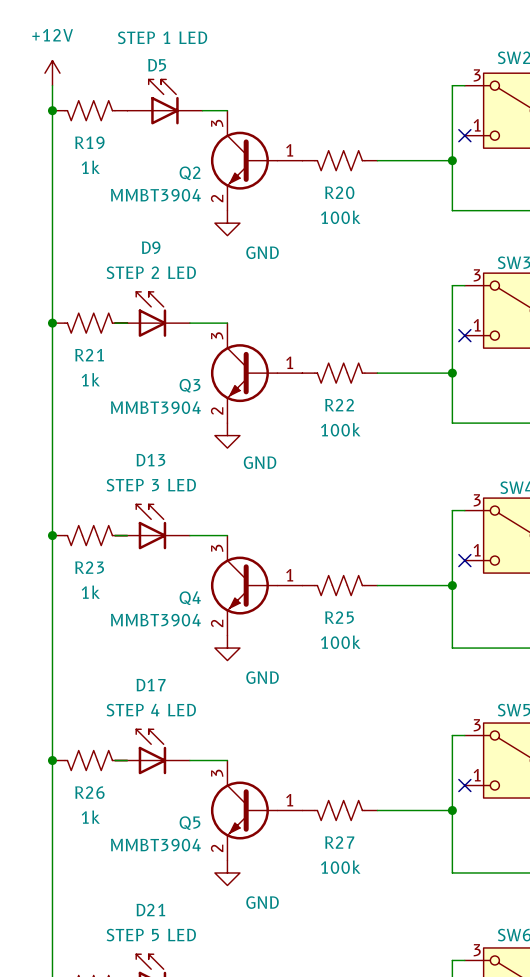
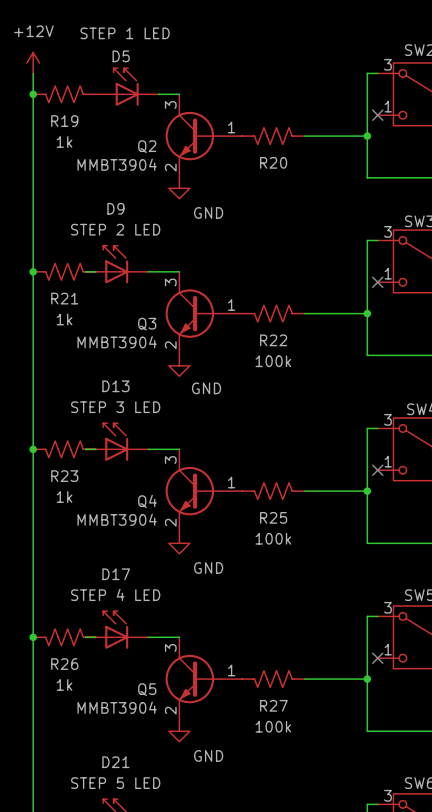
R20 value: 100k (340, 217) -> none

